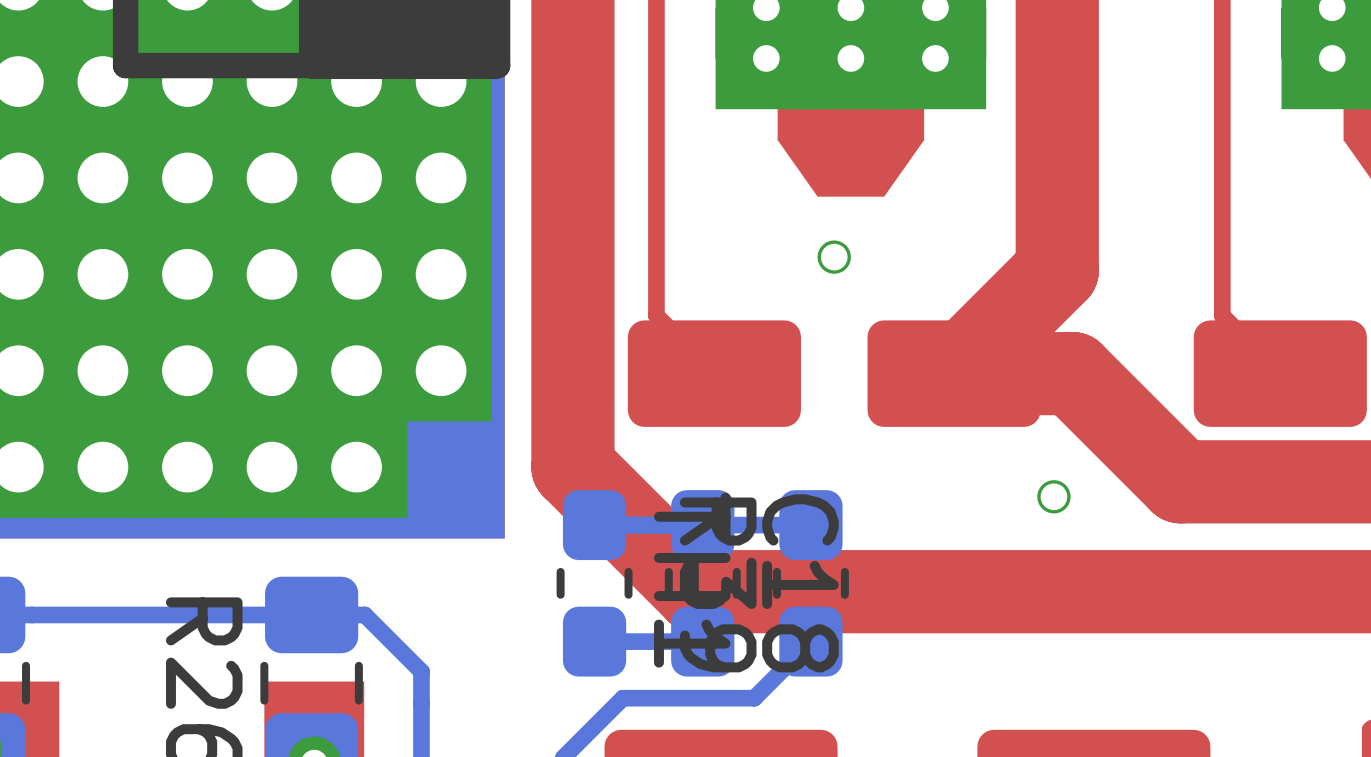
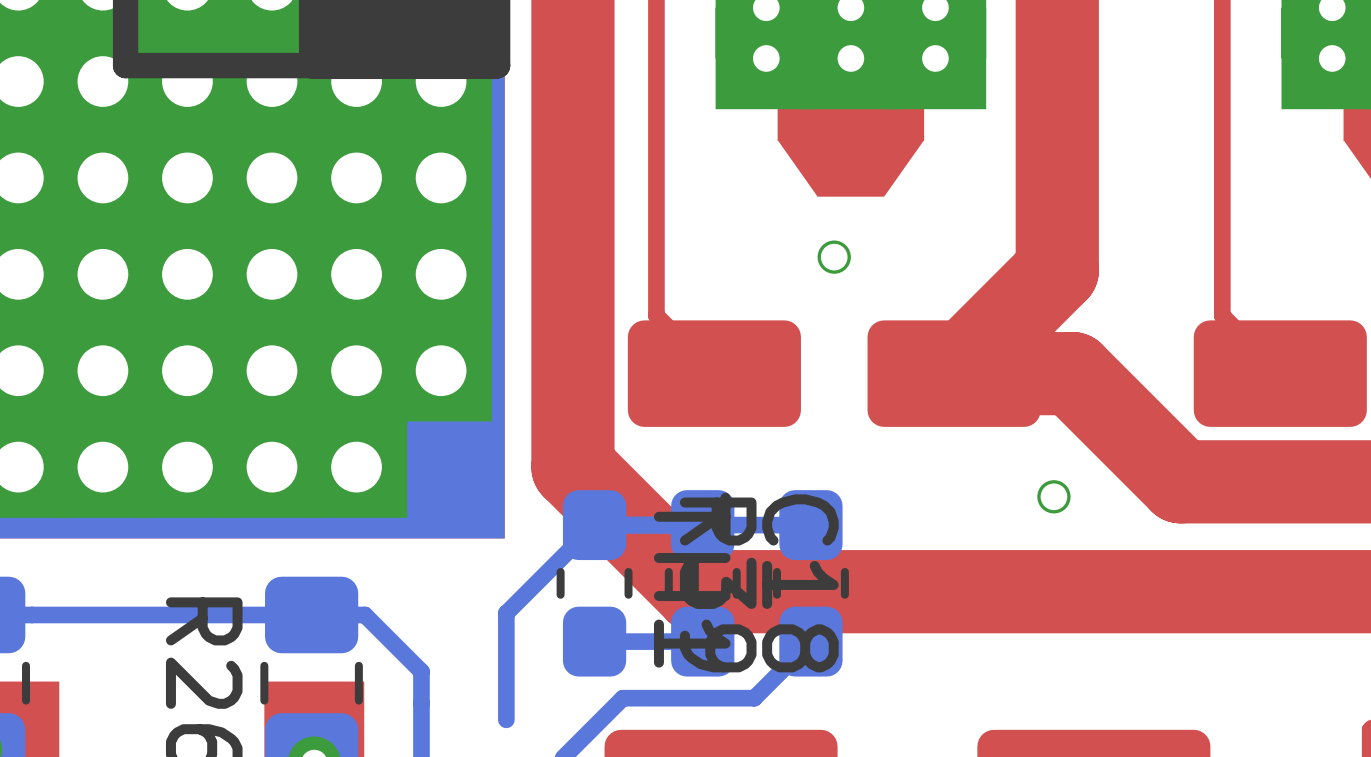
bottom track: none -> (594, 525) (506, 613) (506, 719)

